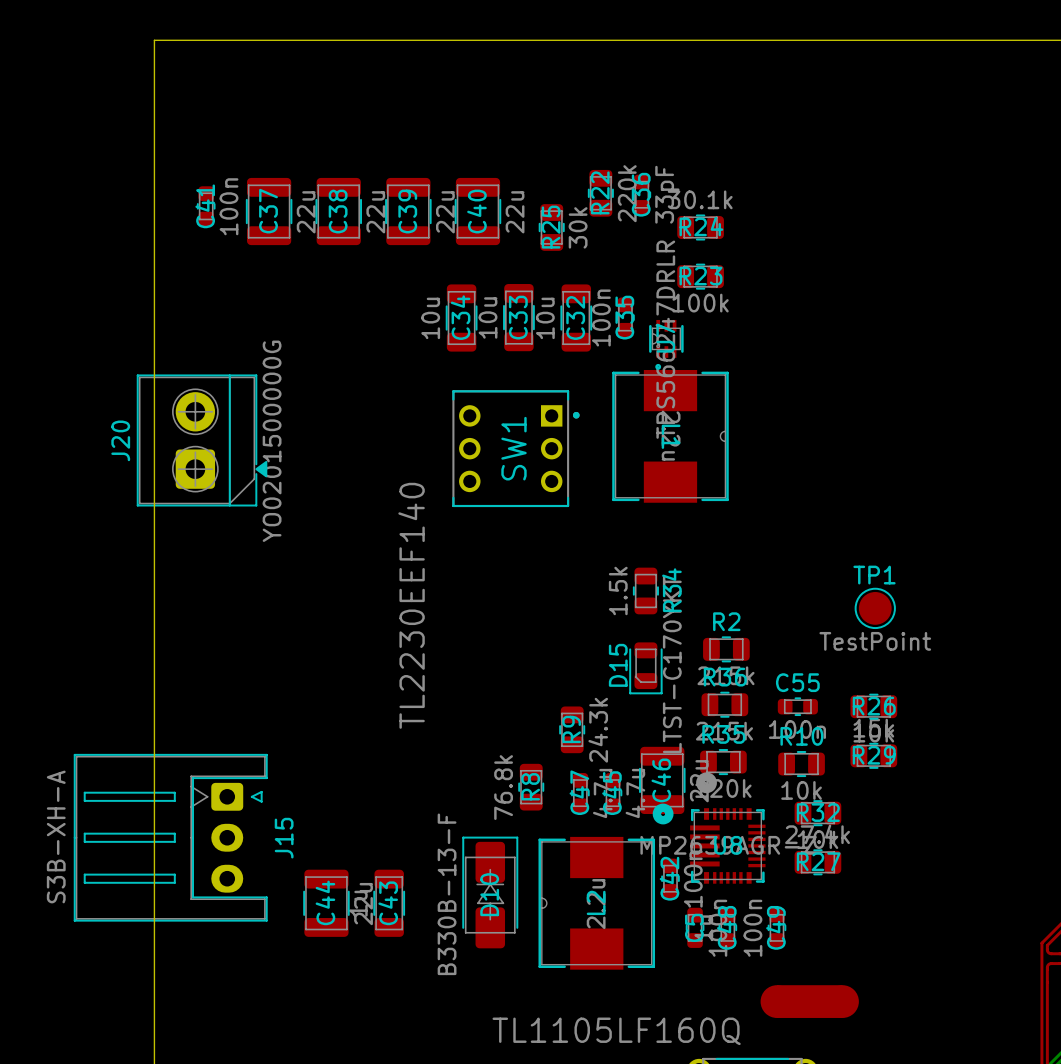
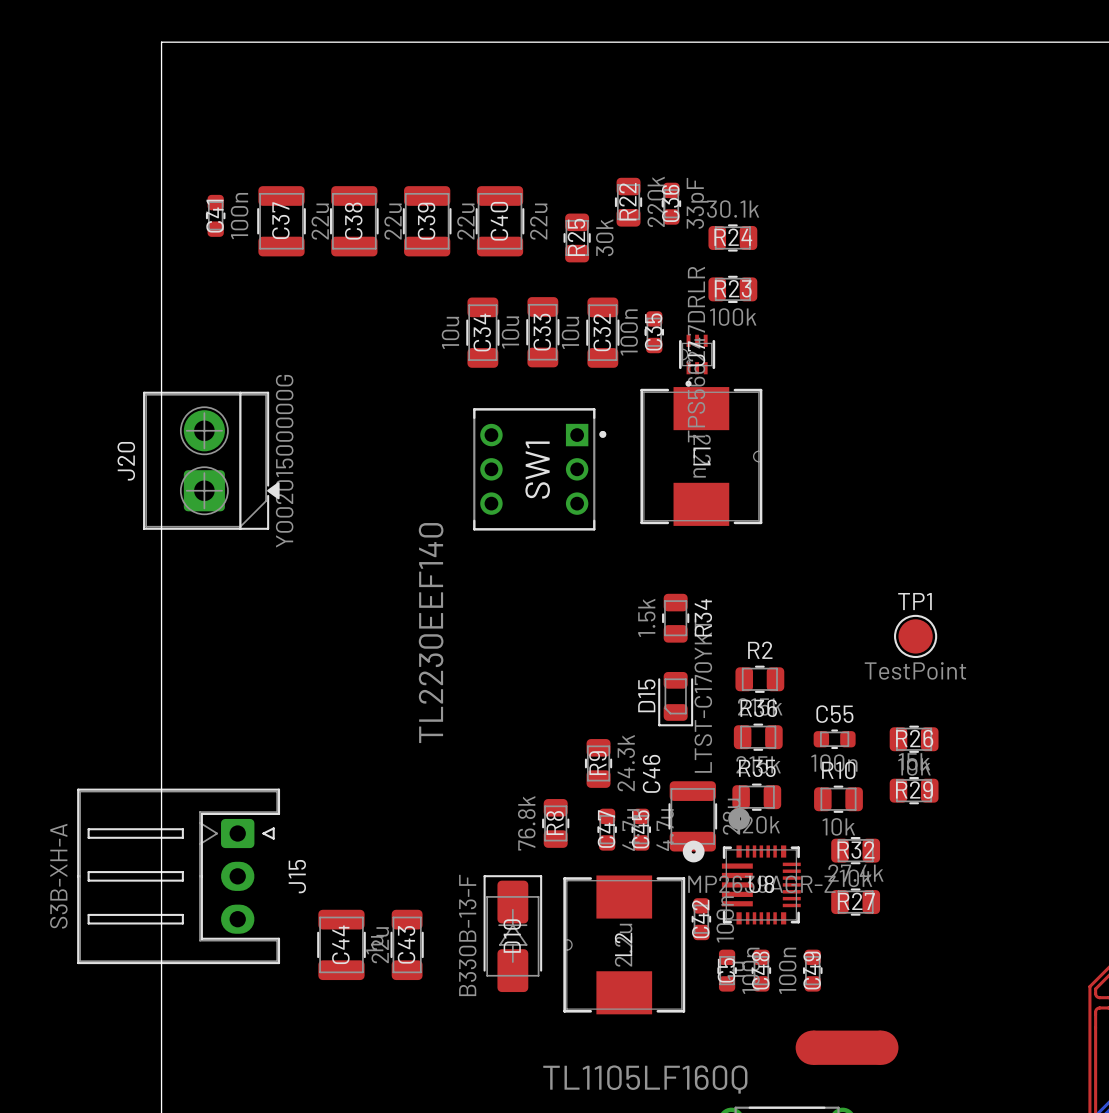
C46 name position: C46 (661, 780) -> C46 (651, 773)

